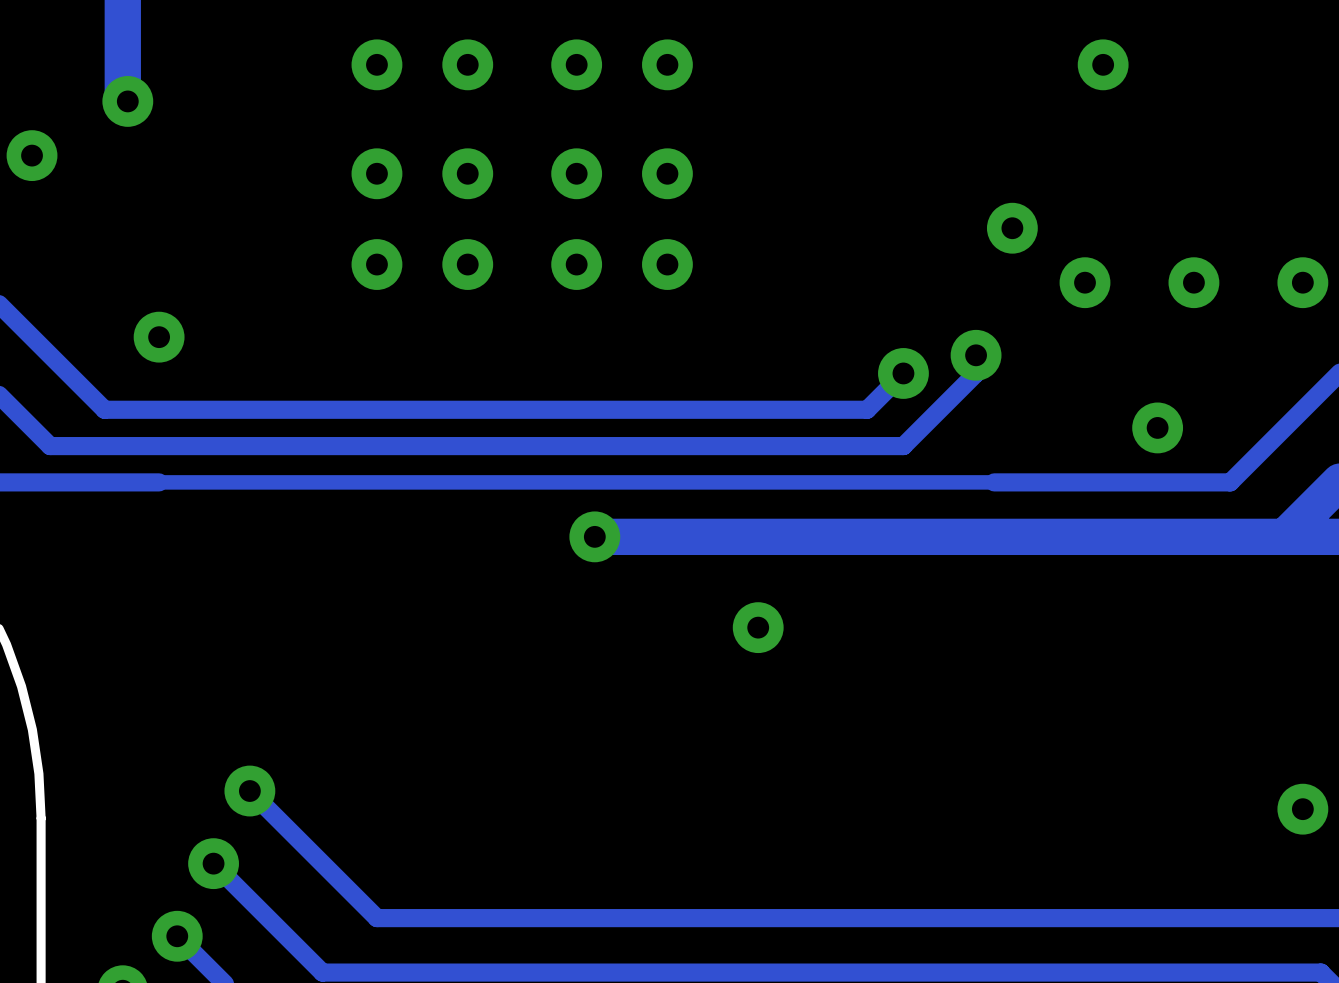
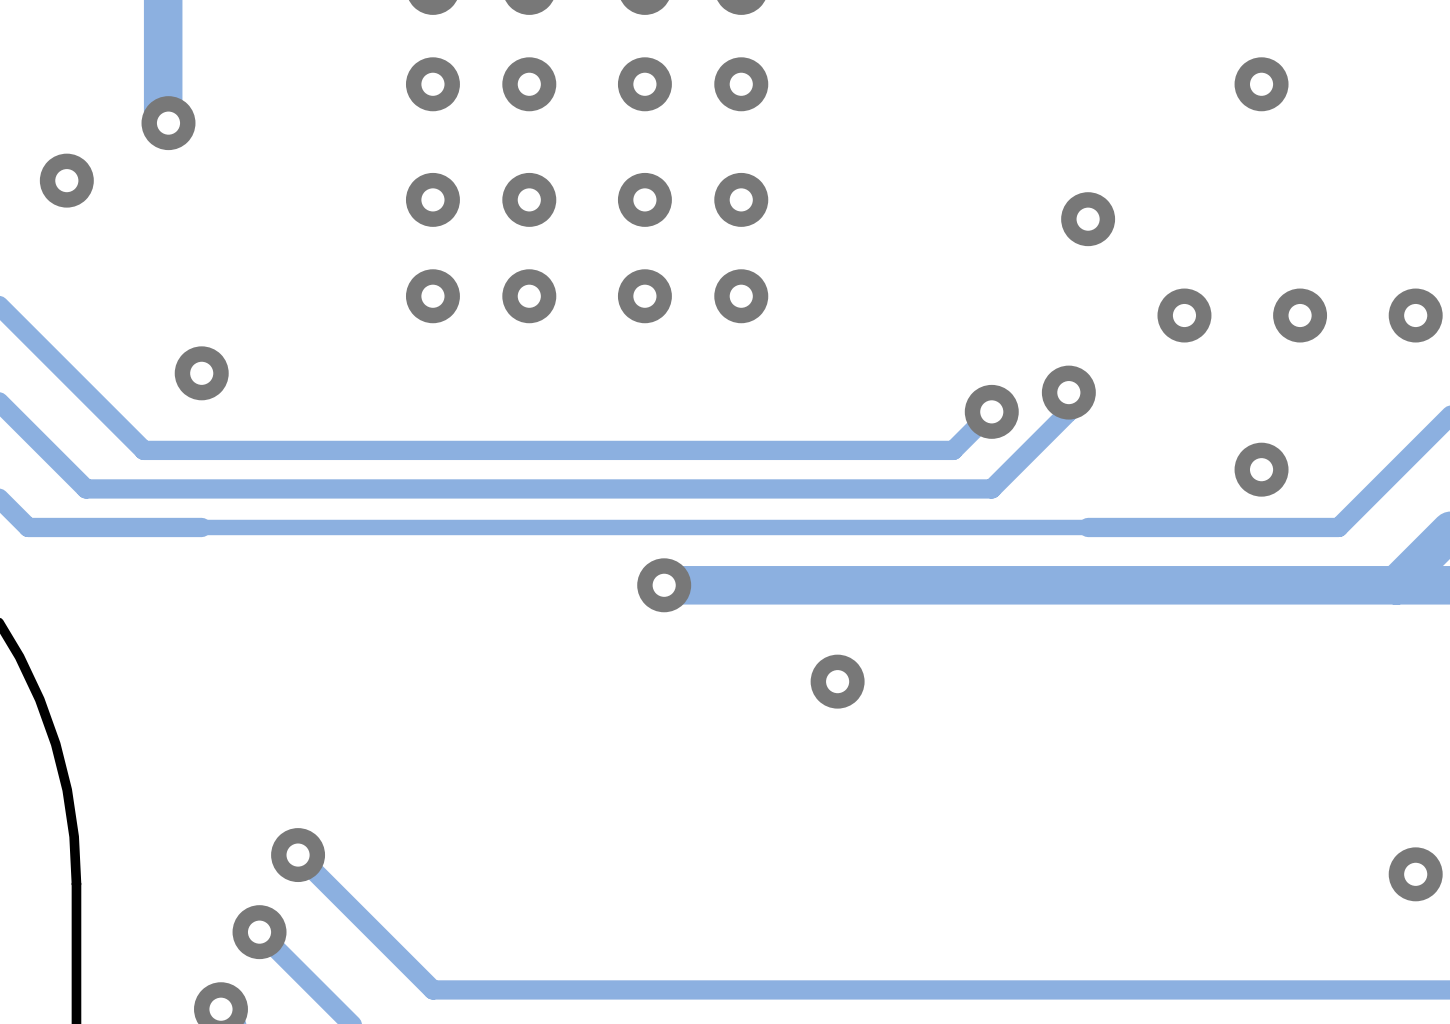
via position: (1103, 64) -> (1261, 84)
via position: (1012, 228) -> (1088, 219)

